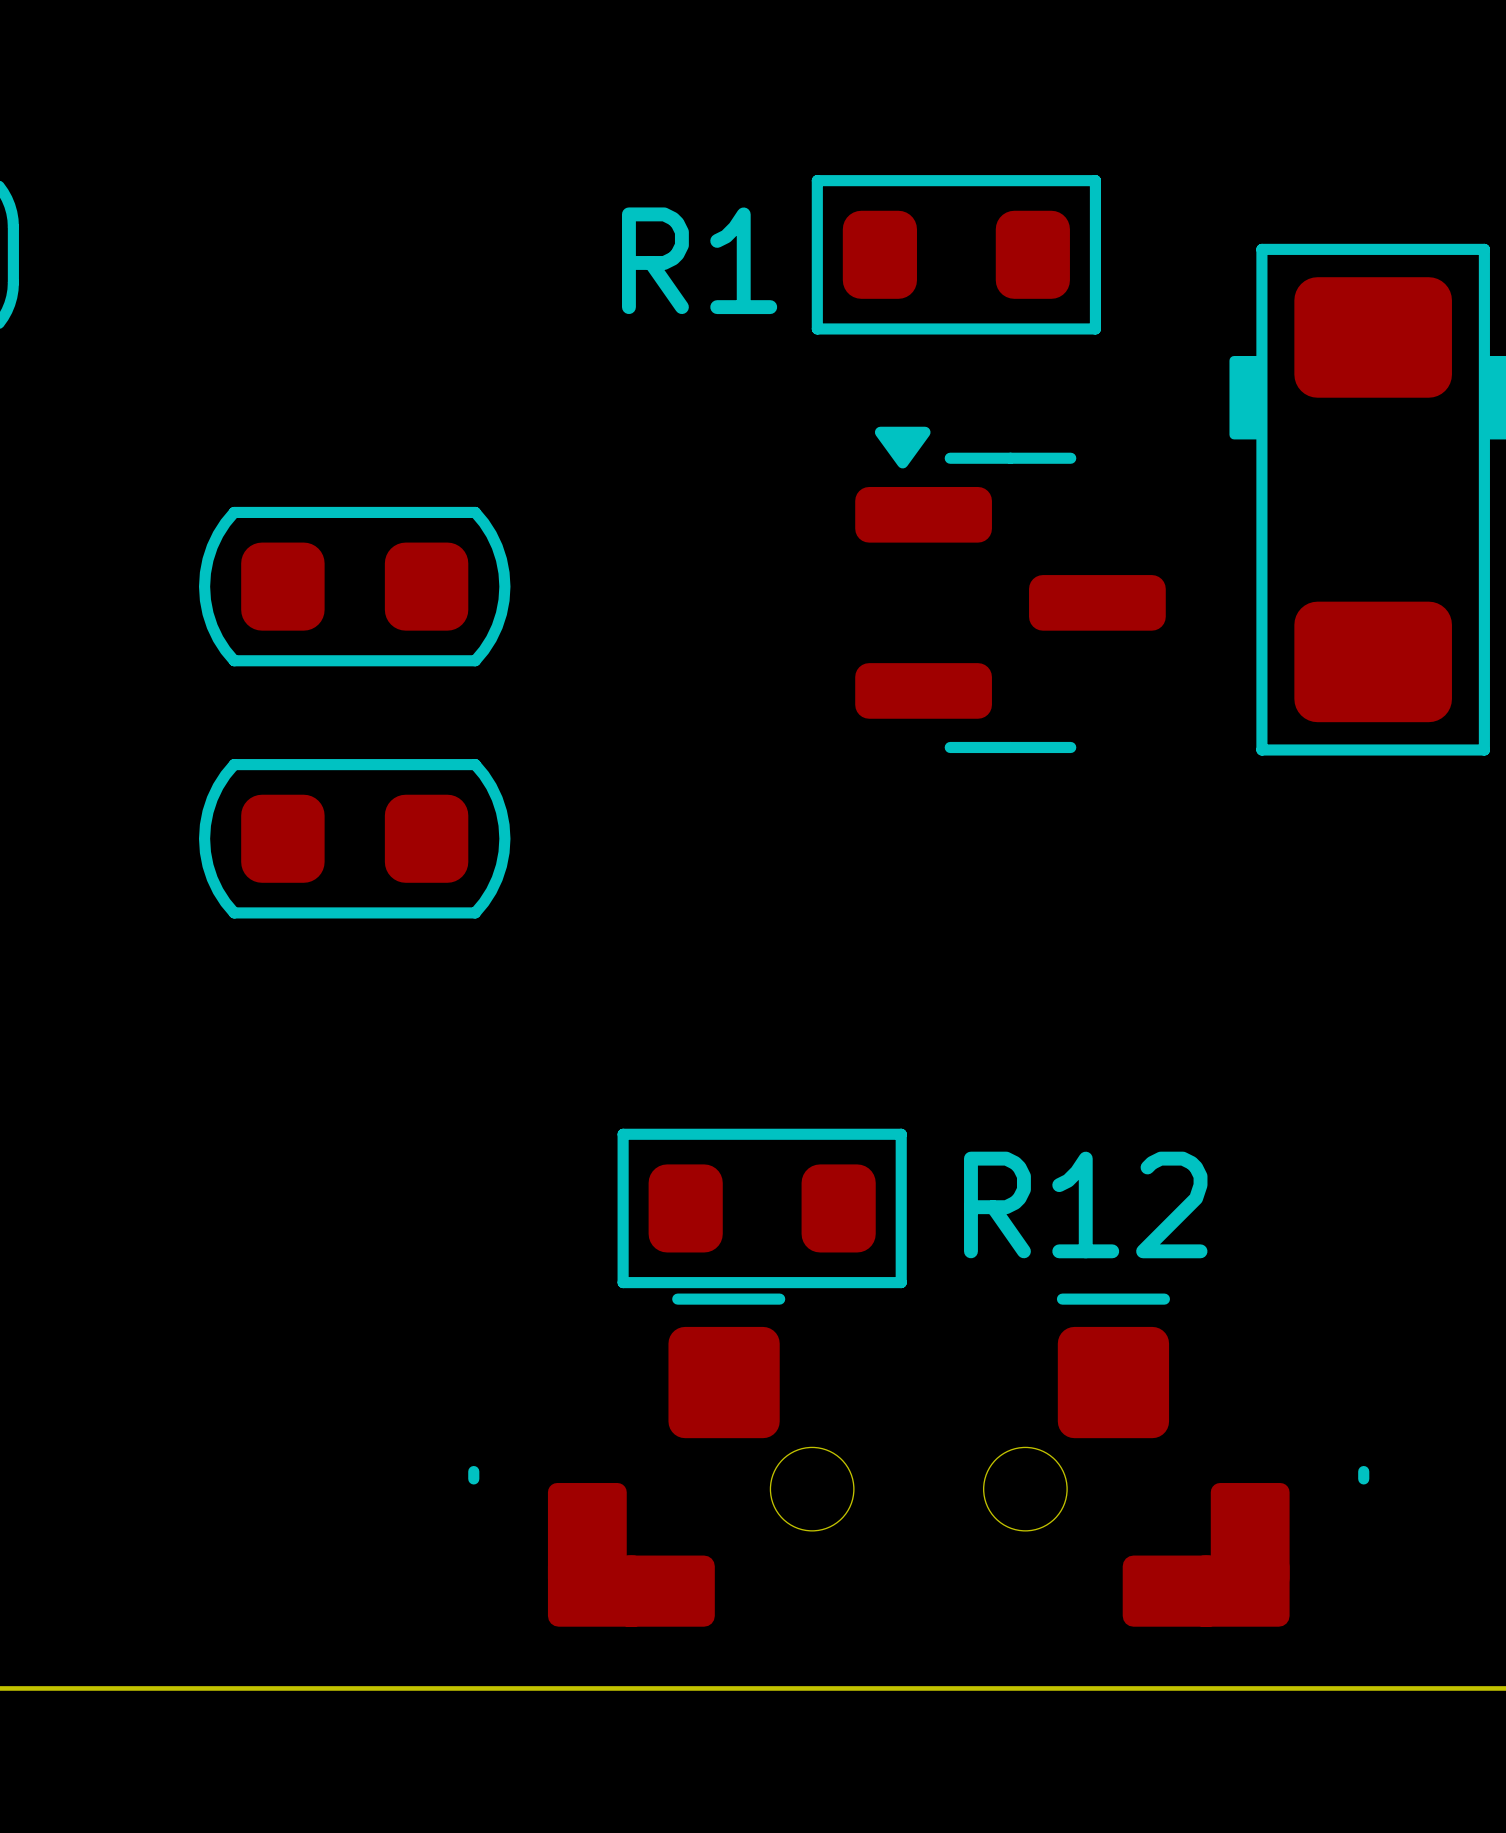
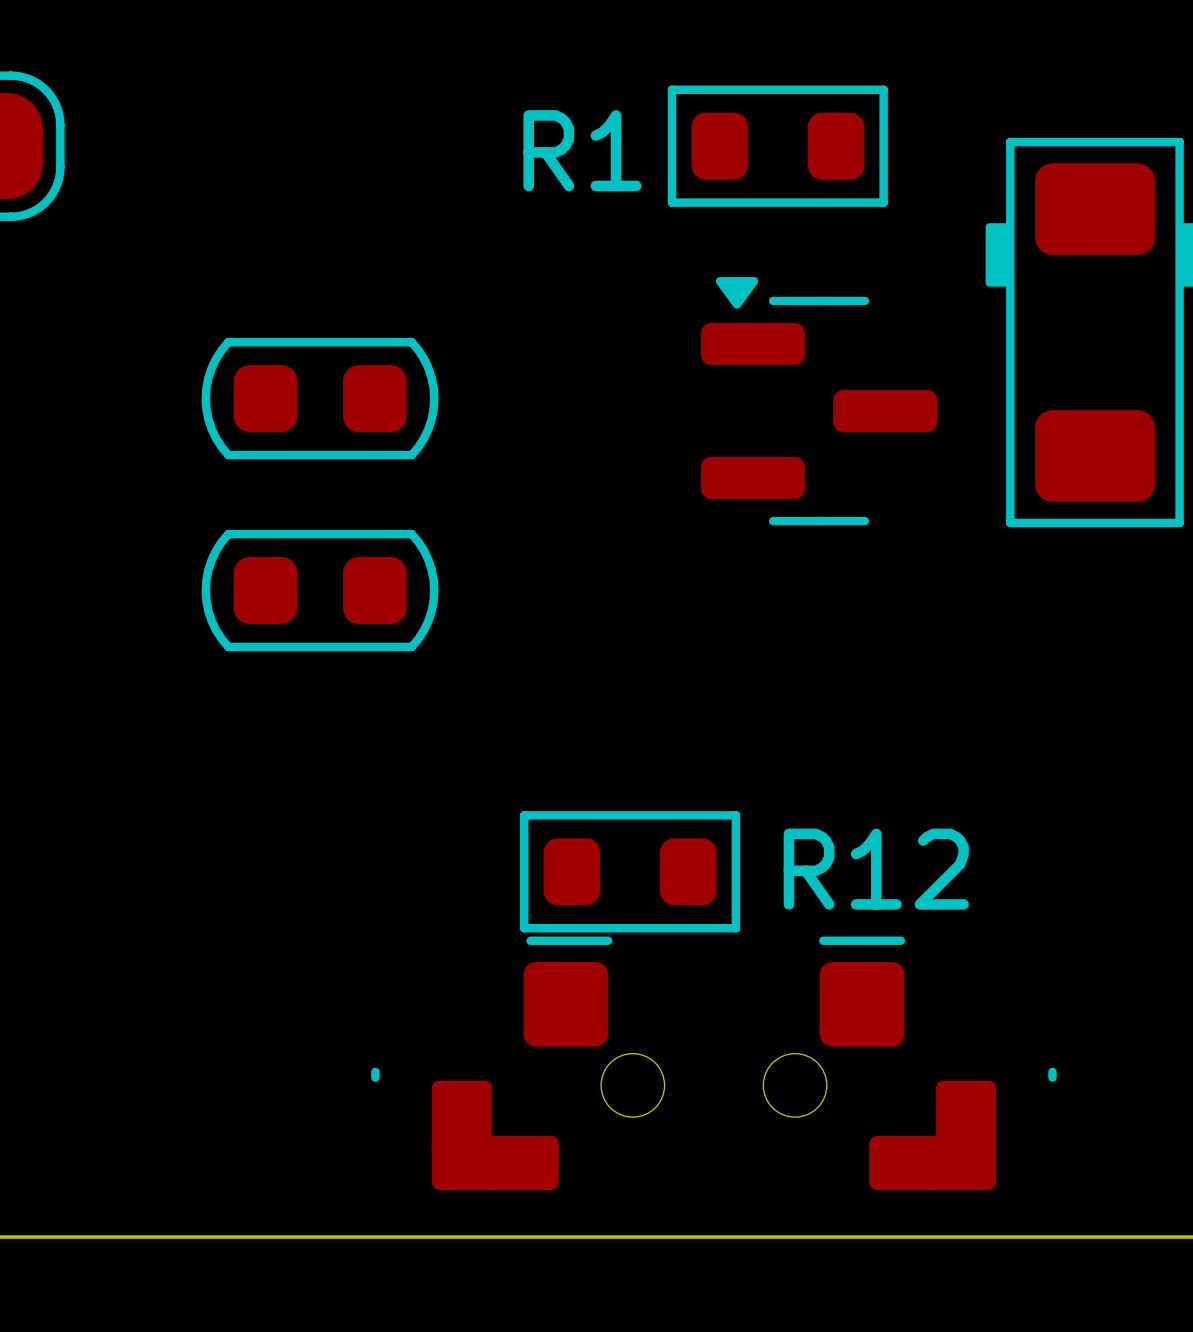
part position: (918, 1460) -> (713, 1063)

